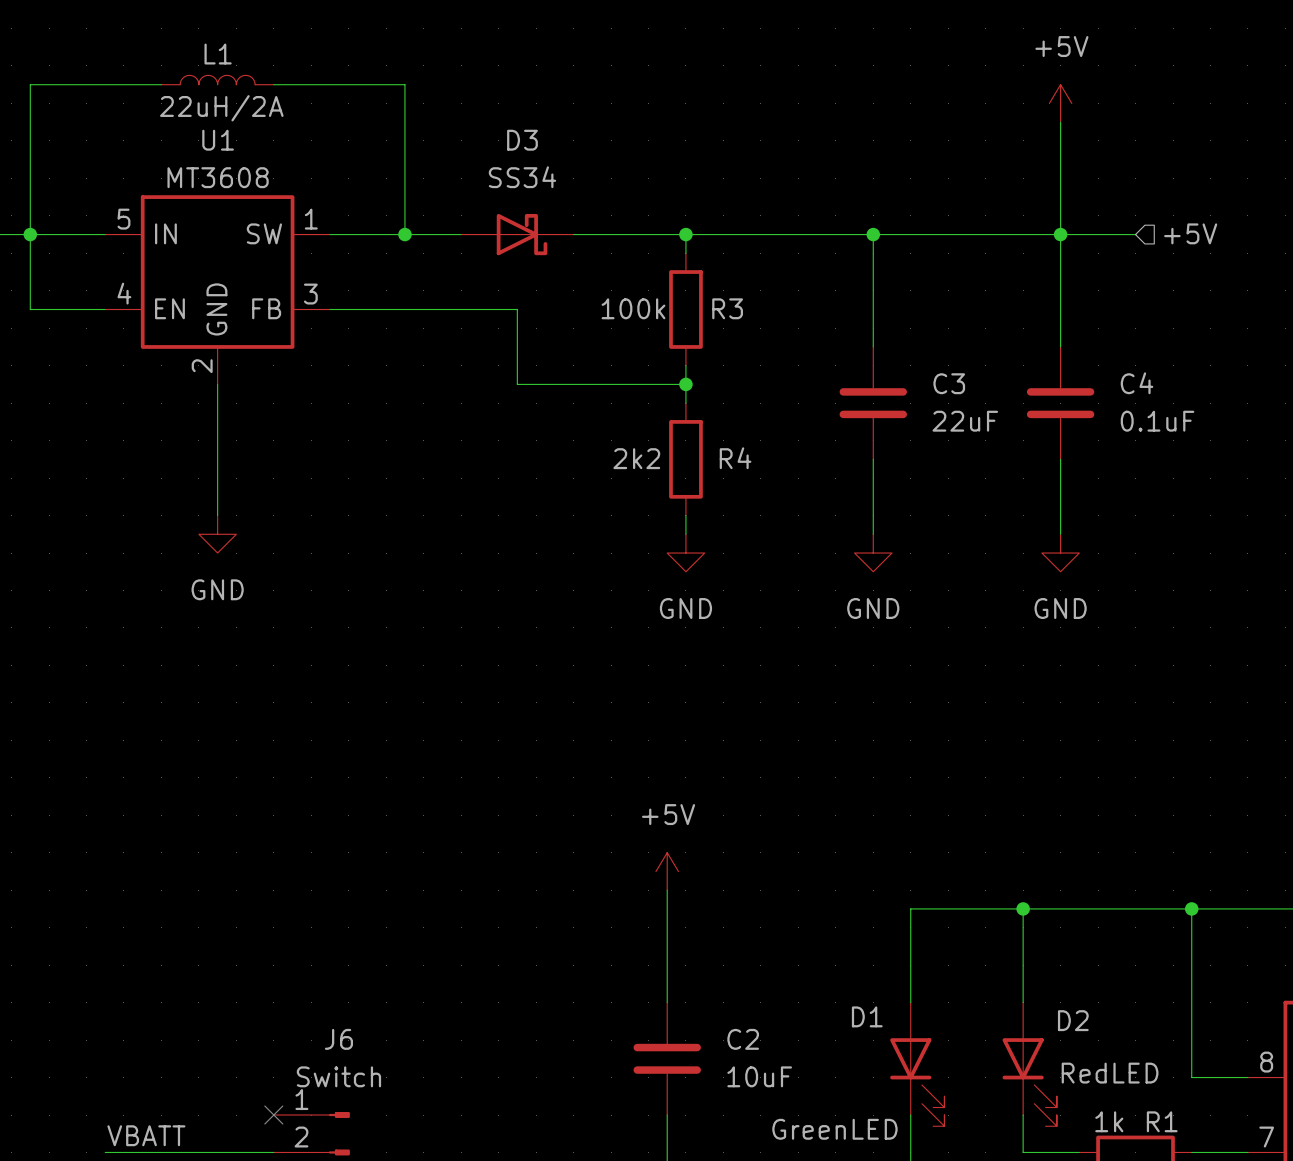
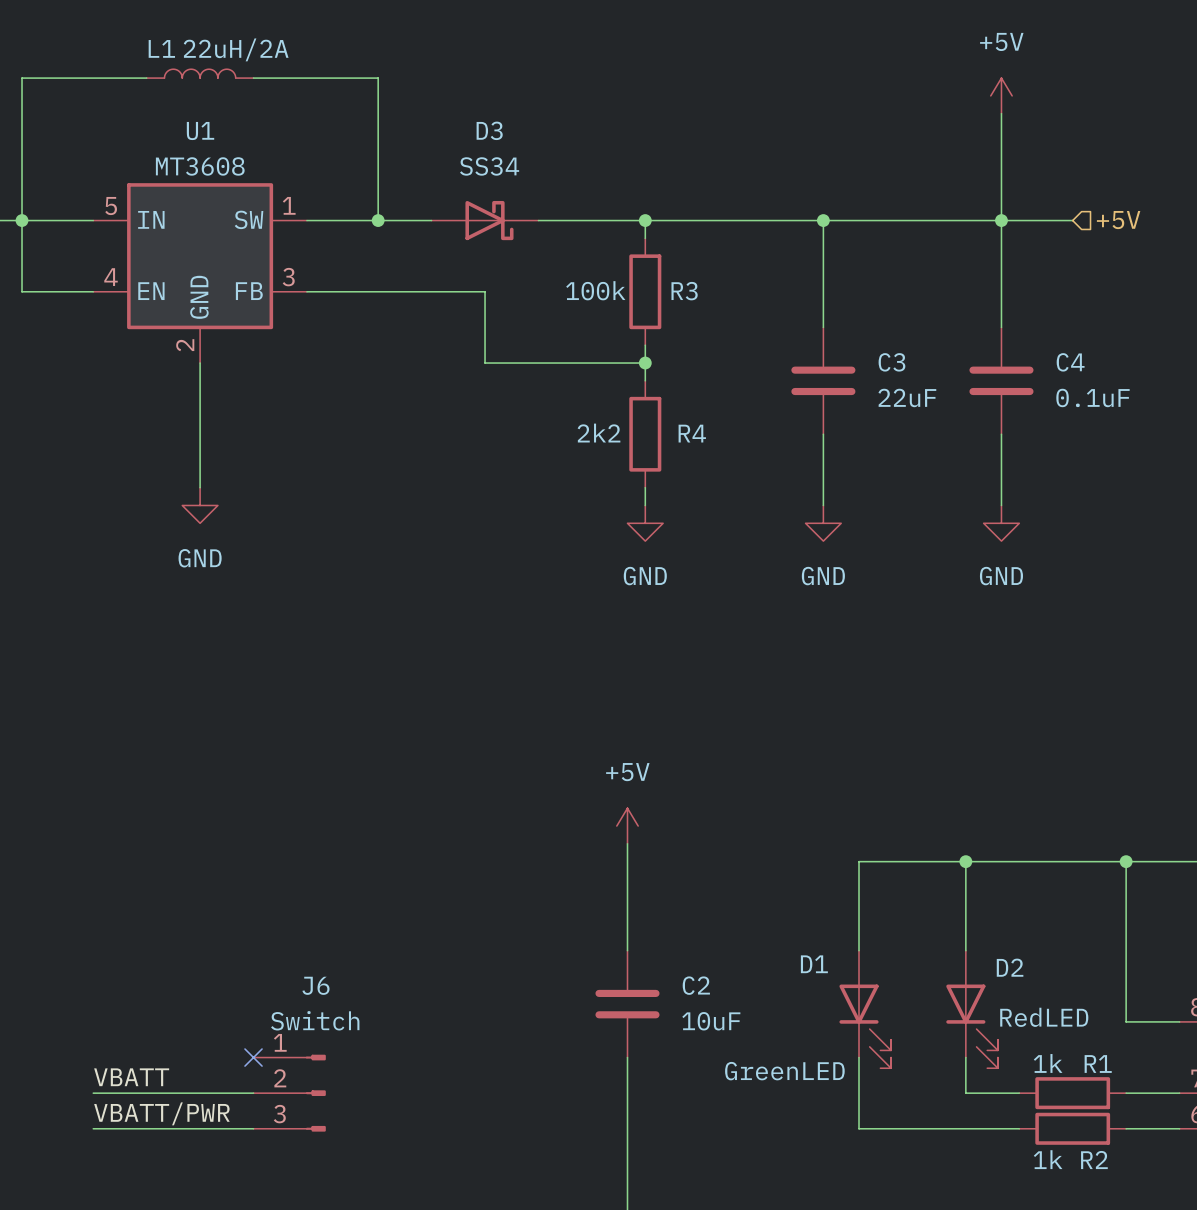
L1 name position: L1 (218, 54) -> L1 (161, 48)
L1 value position: 22uH/2A (221, 108) -> 22uH/2A (236, 49)

